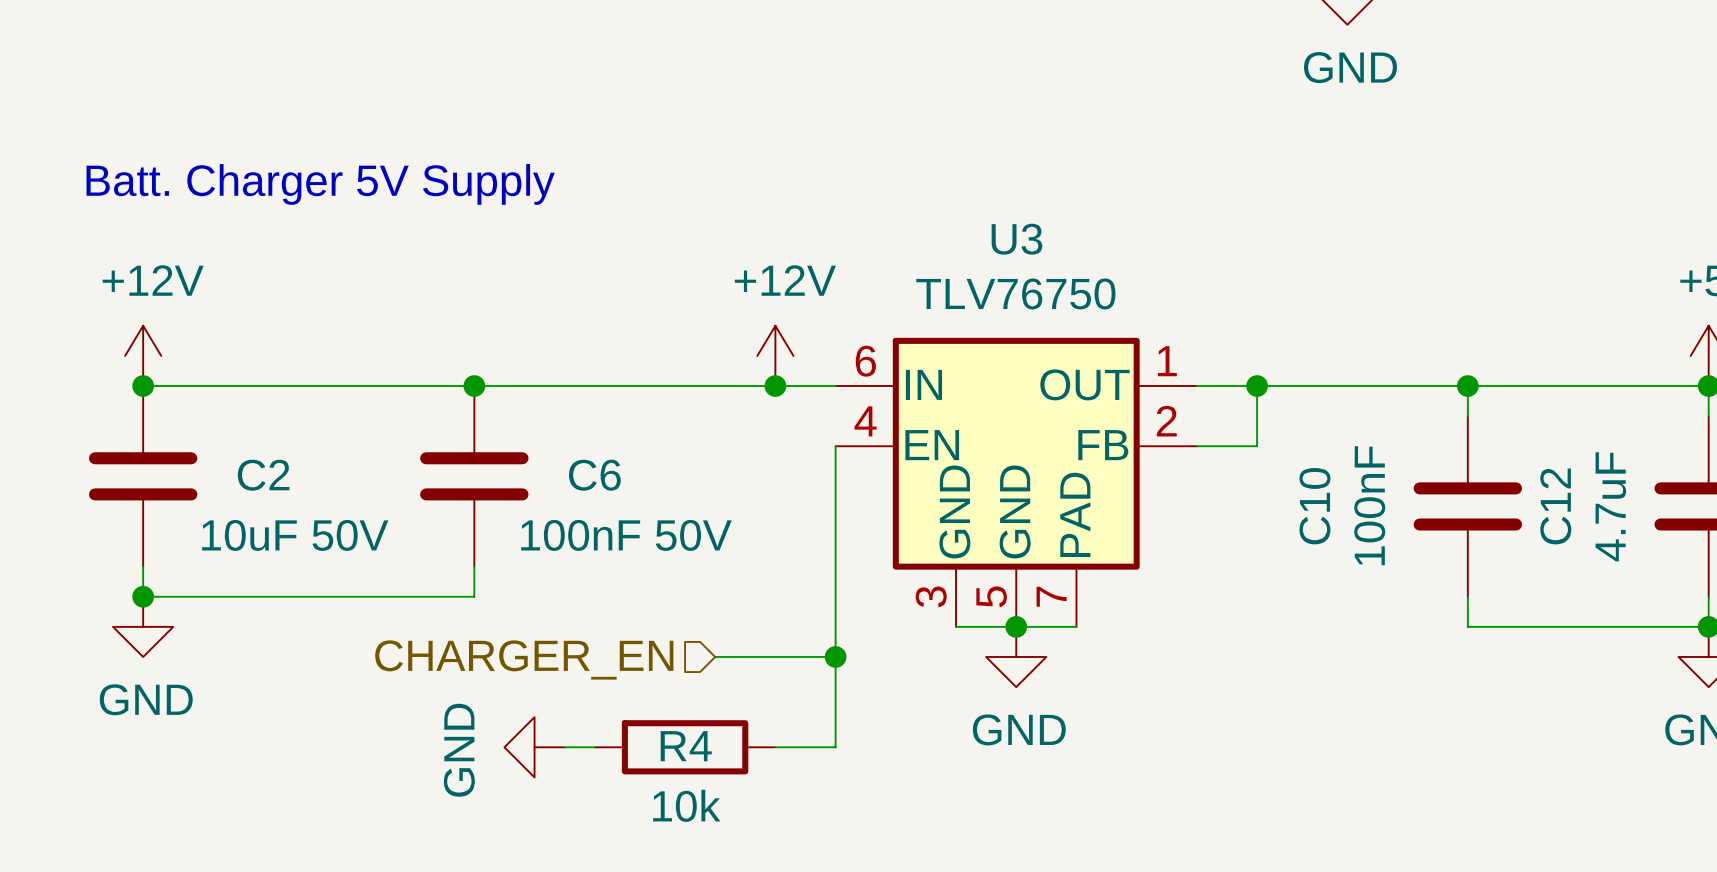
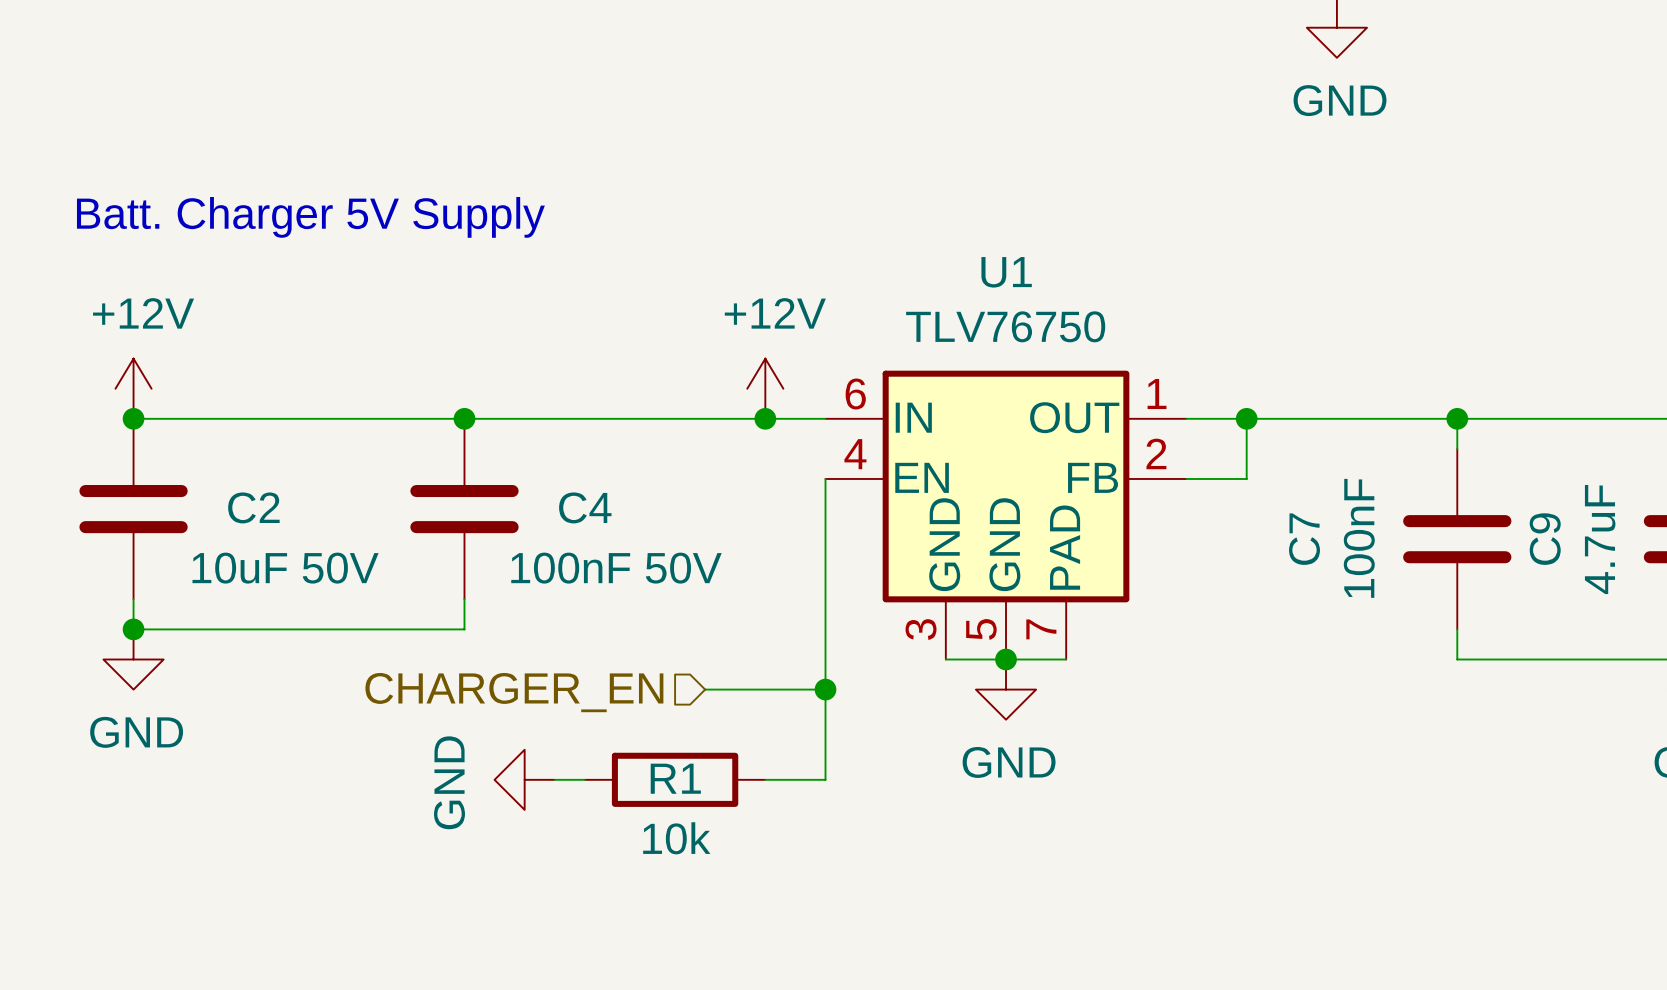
U3 name: U3 (1016, 239) -> U1 (1006, 272)
C6 name: C6 (594, 475) -> C4 (585, 507)
C10 name: C10 (1314, 506) -> C7 (1304, 539)
C12 name: C12 (1555, 506) -> C9 (1545, 539)
R4 name: R4 (686, 746) -> R1 (675, 778)

